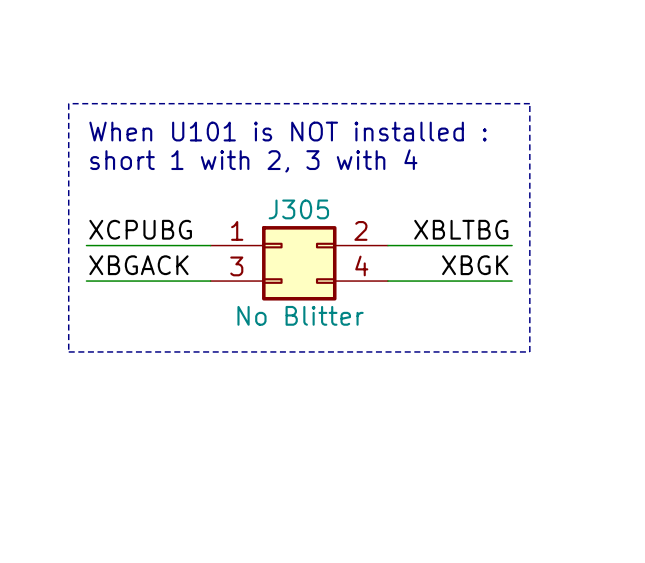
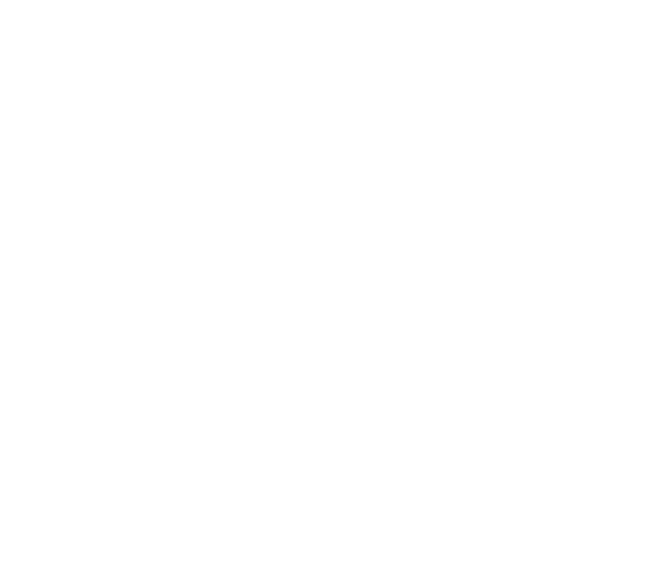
line: (68, 103) (68, 351) (529, 351) (529, 103) (68, 103) -> none
text: When U101 is NOT installed : (288, 131) -> none
text: short 1 with 2, 3 with 4 (253, 160) -> none
label: XCPUBG (140, 229) -> none
label: XBLTBG (461, 229) -> none
wire: (86, 245) (210, 245) -> none
wire: (387, 245) (512, 245) -> none
J305: No Blitter (299, 263) -> none
label: XBGACK (138, 265) -> none
label: XBGK (475, 265) -> none
wire: (86, 281) (210, 281) -> none
wire: (387, 281) (512, 281) -> none

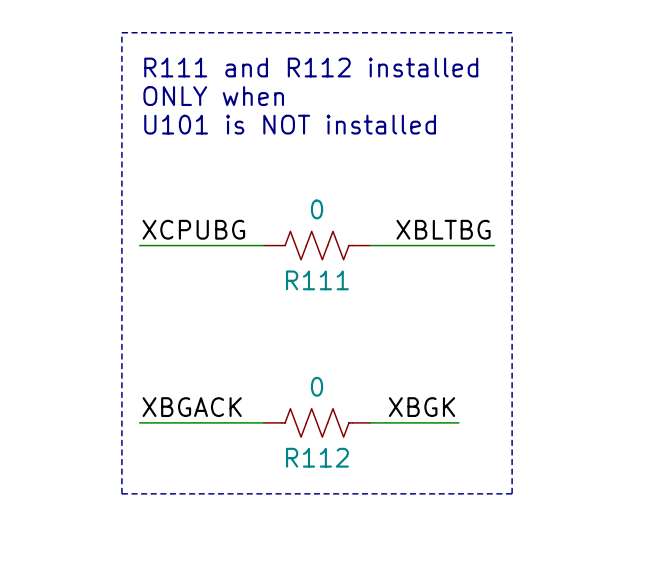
line: none -> (121, 32) (121, 493) (512, 493) (512, 32) (121, 32)
text: none -> R111 and R112 installed (311, 67)
text: none -> ONLY when (213, 96)
text: none -> U101 is NOT installed (290, 124)
label: none -> XCPUBG (193, 229)
label: none -> XBLTBG (443, 229)
wire: none -> (139, 245) (263, 245)
R111: none -> 0 (317, 245)
wire: none -> (370, 245) (494, 245)
label: none -> XBGACK (192, 407)
label: none -> XBGK (422, 407)
wire: none -> (139, 422) (263, 422)
R112: none -> 0 (317, 422)
wire: none -> (370, 422) (458, 422)

